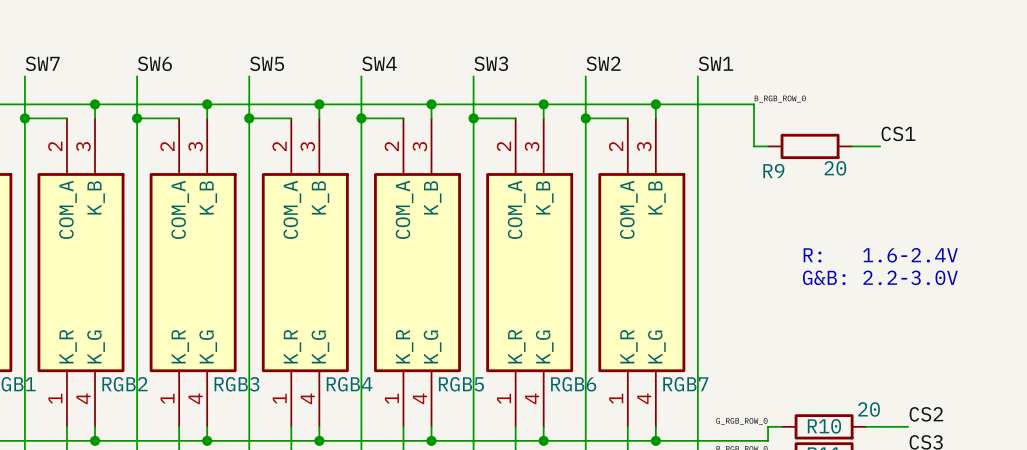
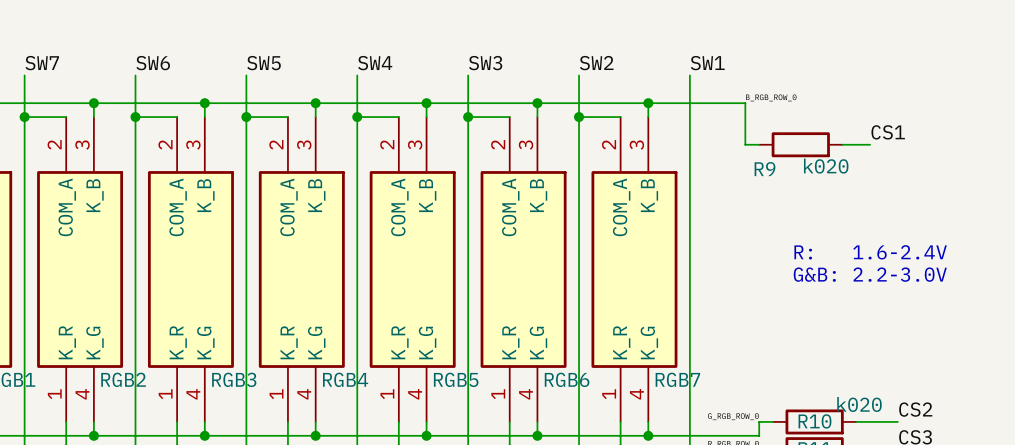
R9 value: 20 (835, 168) -> k020 (826, 166)
R10 value: 20 (869, 409) -> k020 (859, 404)

